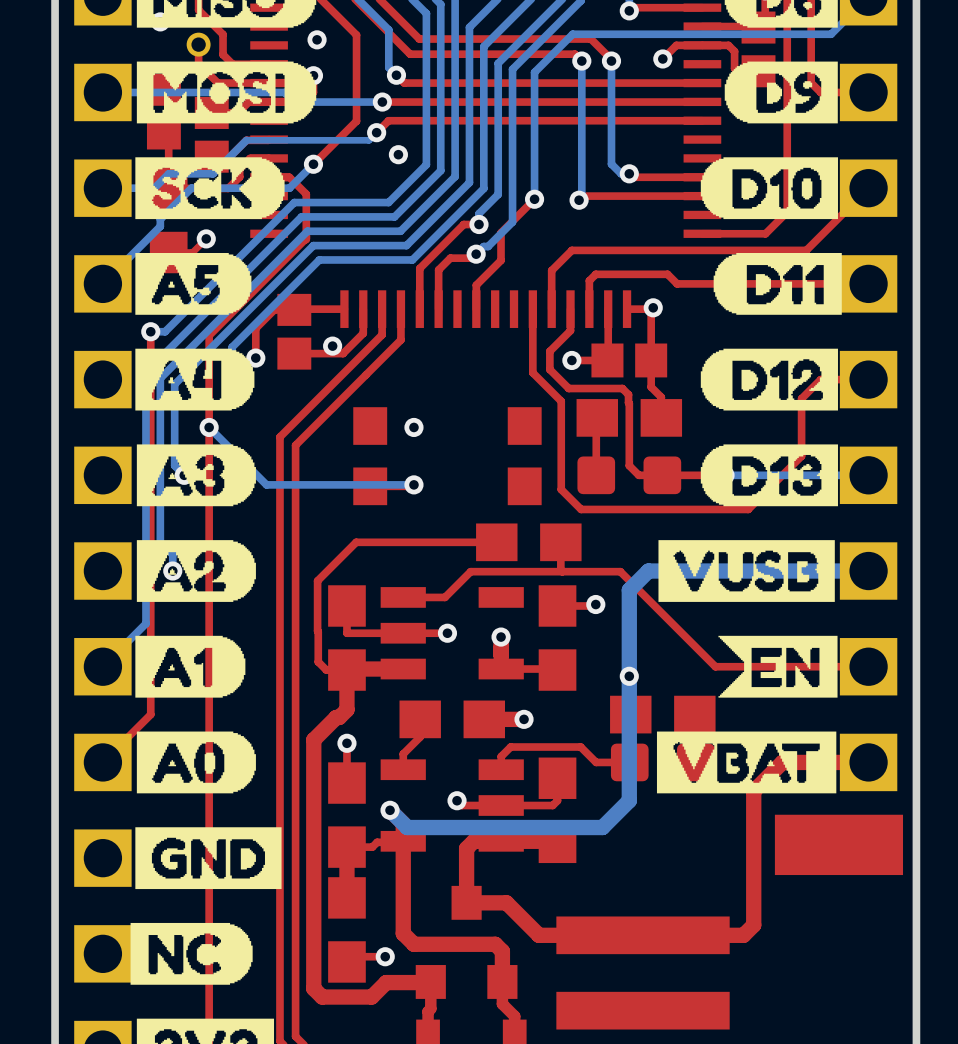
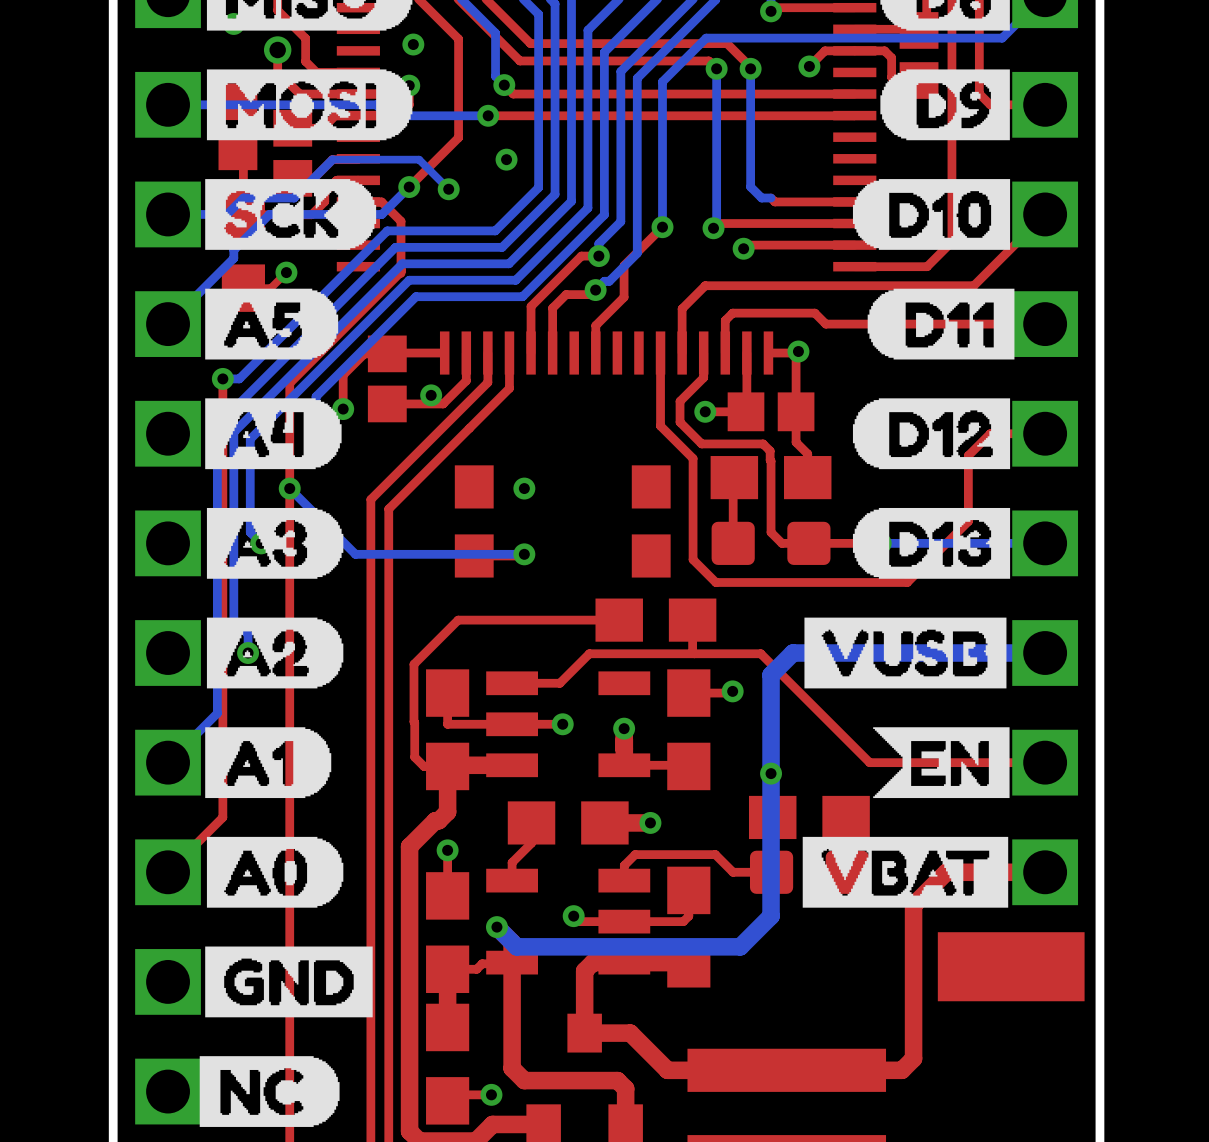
top track: (702, 120) (388, 120) (376, 132) -> none
bottom track: (376, 132) (368, 140) (322, 140) -> (448, 189) (419, 159)
via: (376, 132) -> none
via position: (398, 154) -> (506, 159)
via: none -> (448, 189)
via position: (629, 173) -> (743, 248)
top track: none -> (854, 245) (747, 245) (743, 248)

